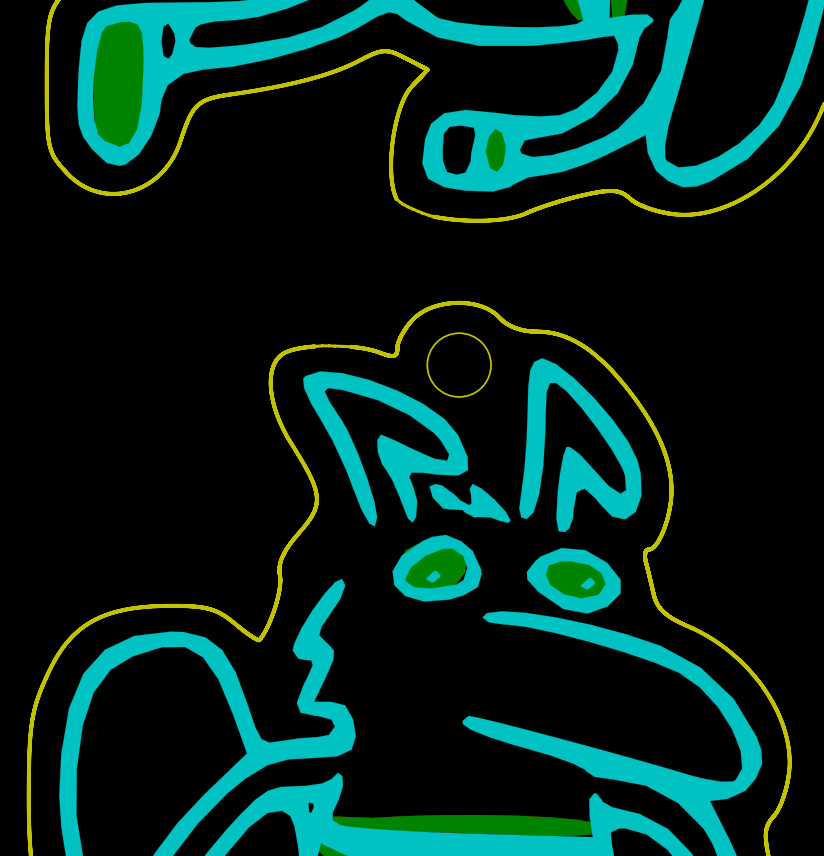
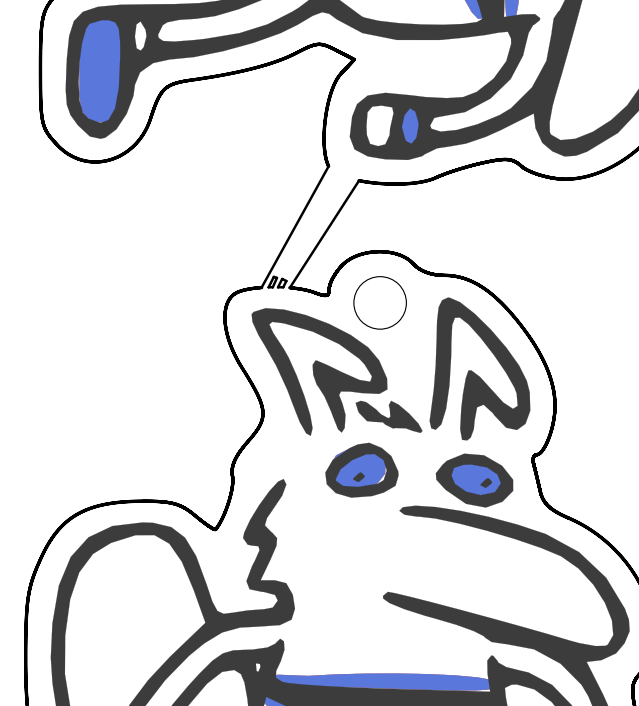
board edge: (396, 199) (408, 206) (433, 216) -> (290, 287) (359, 180)
board edge: none -> (273, 276) (276, 277) (272, 287) (268, 287) (273, 276)
board edge: none -> (282, 278) (286, 281) (283, 287) (278, 287) (282, 278)
board edge: (315, 346) (350, 346) -> (261, 287) (328, 166)

